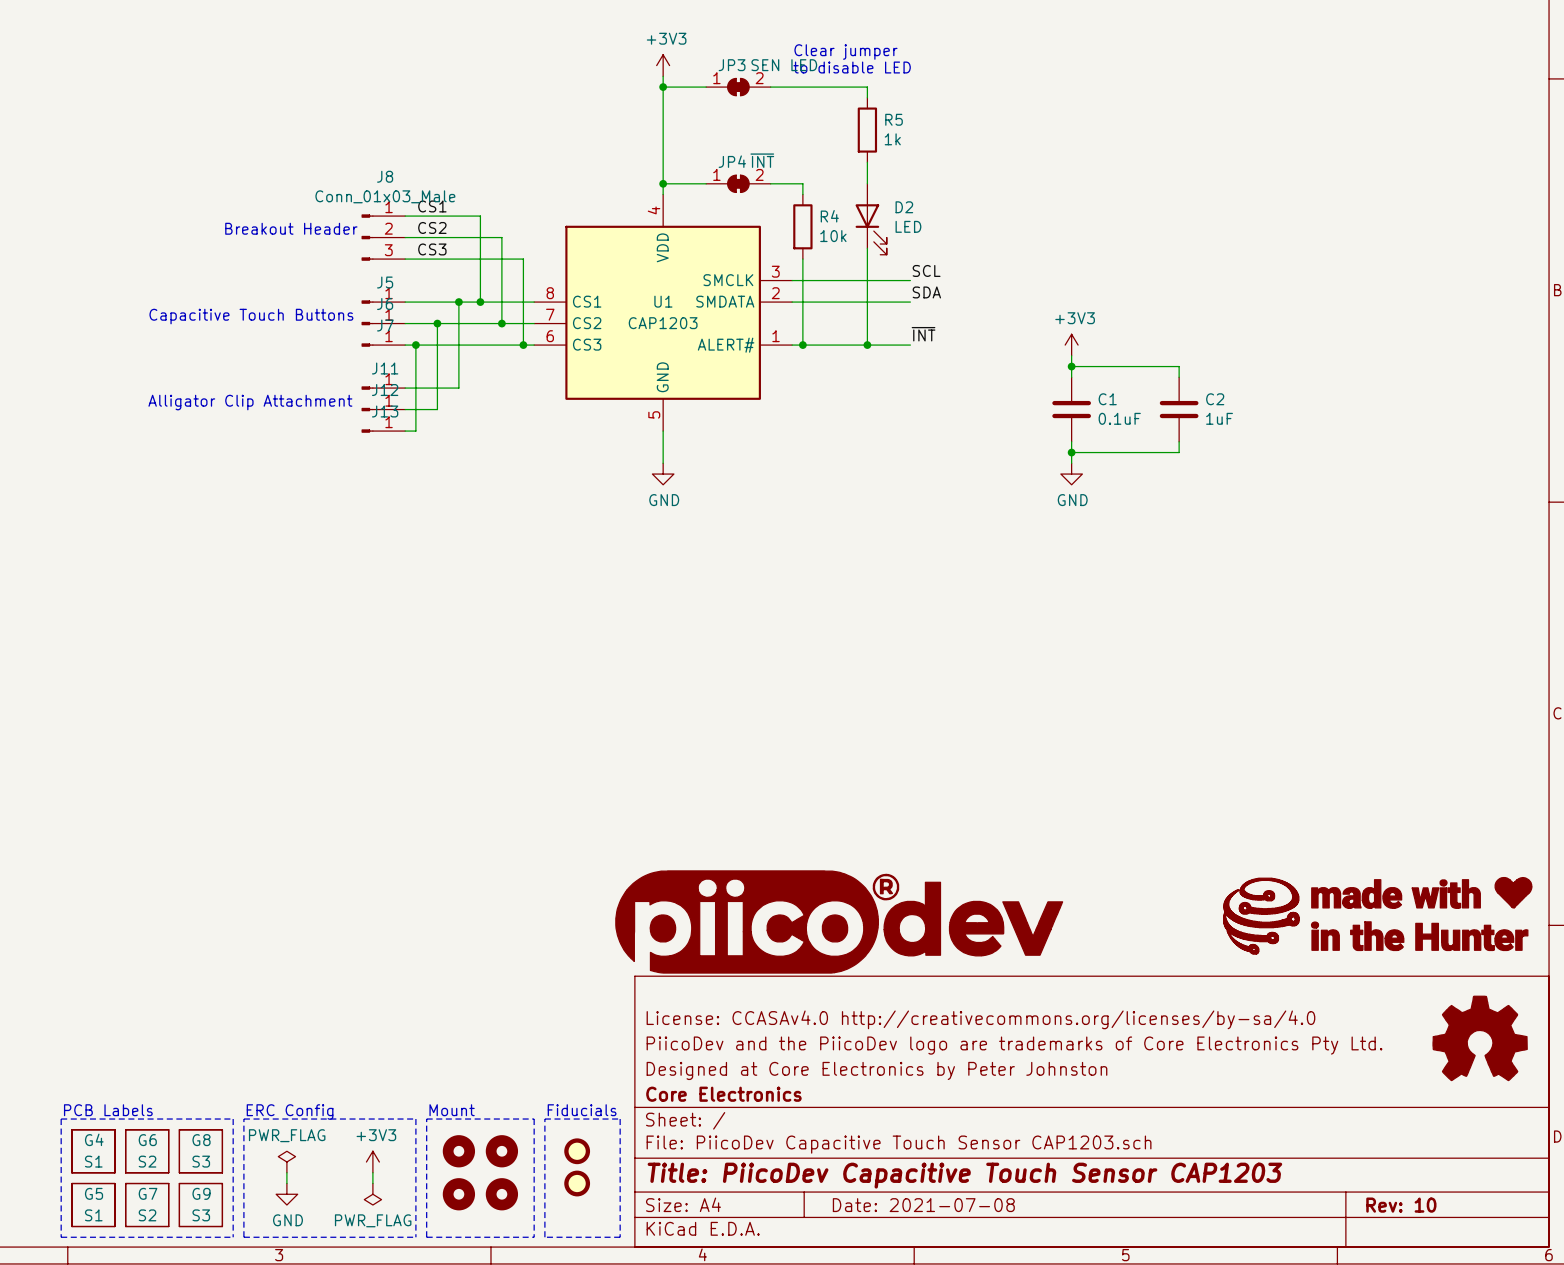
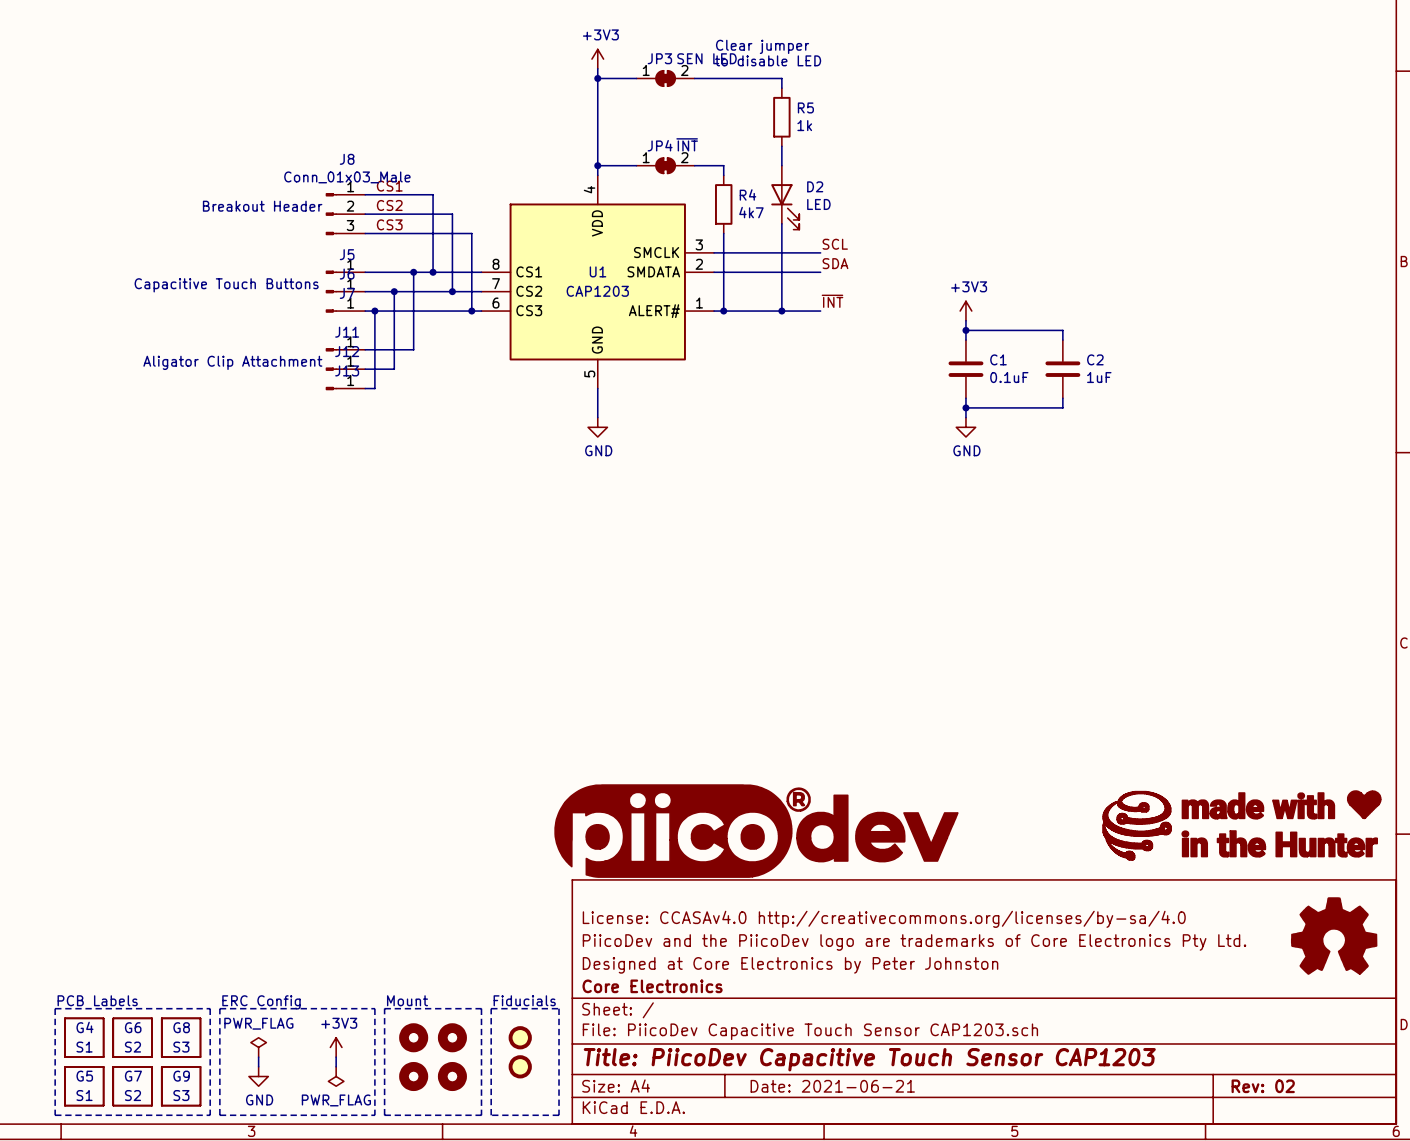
R4 value: 10k (833, 236) -> 4k7 (751, 212)
text: Alligator Clip Attachment (250, 402) -> Aligator Clip Attachment (232, 362)
title block: Date: 2021-07-08 (923, 1205) -> Date: 2021-06-21 (832, 1086)
title block: Rev: 10 (1401, 1205) -> Rev: 02 (1263, 1086)

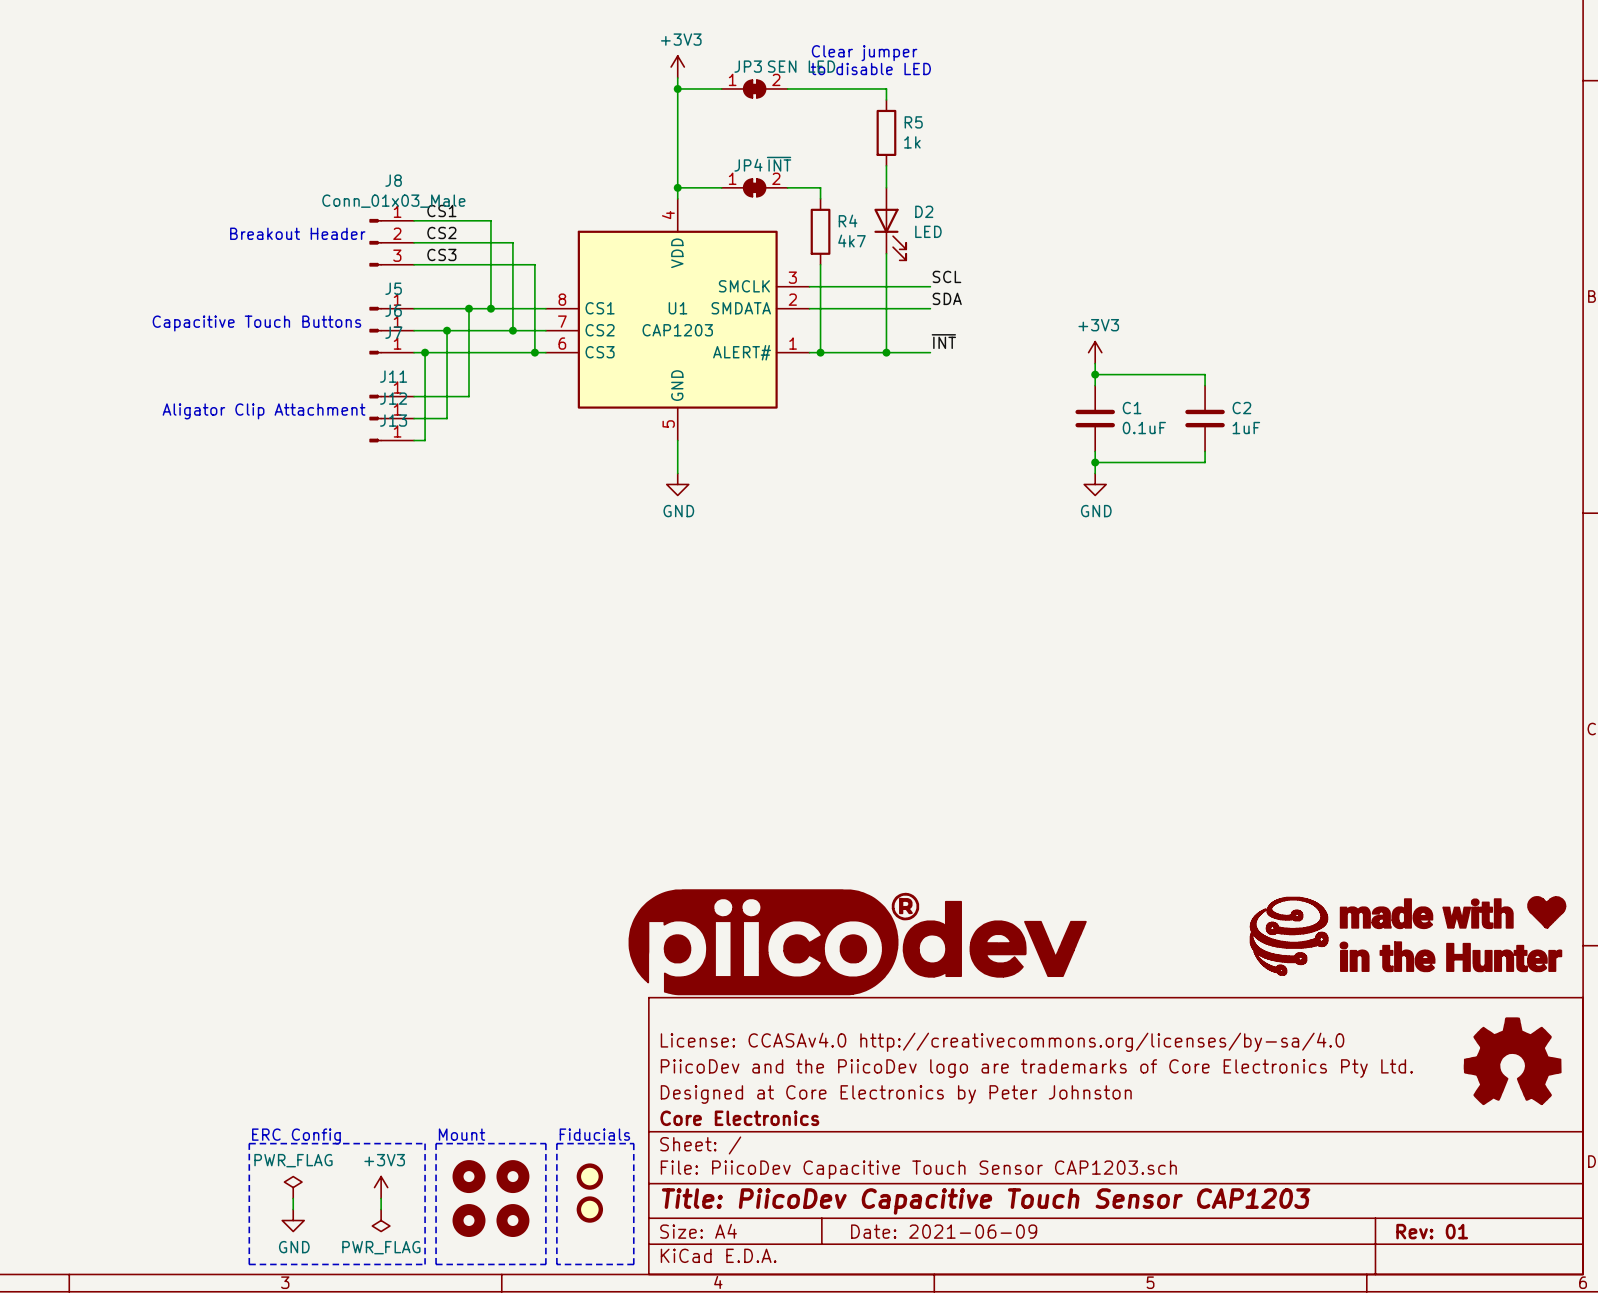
text: PCB Labels (97, 1000) -> none
line: (55, 1008) (55, 1115) (210, 1115) (210, 1008) (55, 1008) -> none
G4: S1 (84, 1037) -> none
G6: S2 (132, 1037) -> none
G8: S3 (181, 1037) -> none
G5: S1 (84, 1086) -> none
G7: S2 (132, 1086) -> none
G9: S3 (181, 1086) -> none
title block: Date: 2021-06-21 (832, 1086) -> Date: 2021-06-09 (944, 1231)
title block: Rev: 02 (1263, 1086) -> Rev: 01 (1432, 1231)

